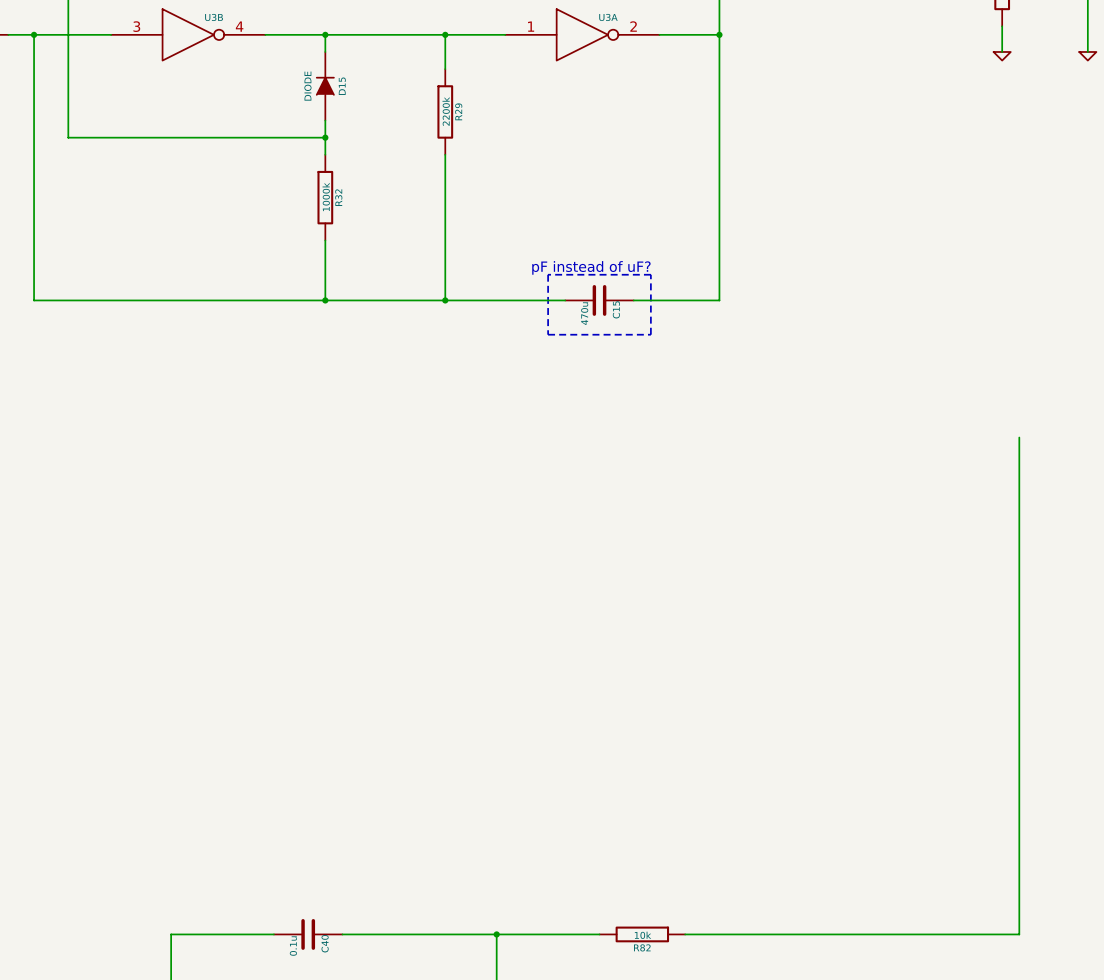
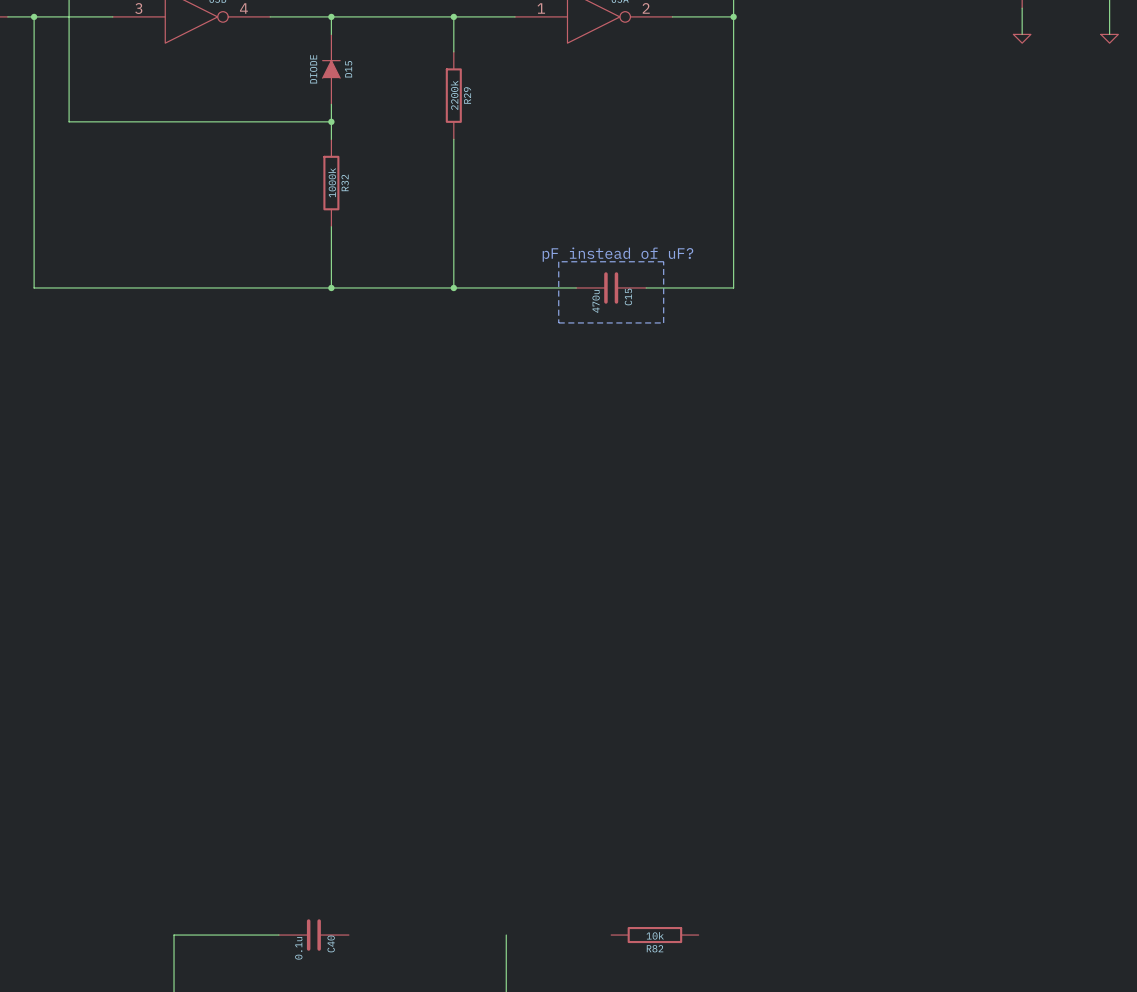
wire: (1019, 437) (1019, 934) (685, 934) -> none
wire: (342, 934) (599, 934) -> none
junction: (496, 934) -> none

